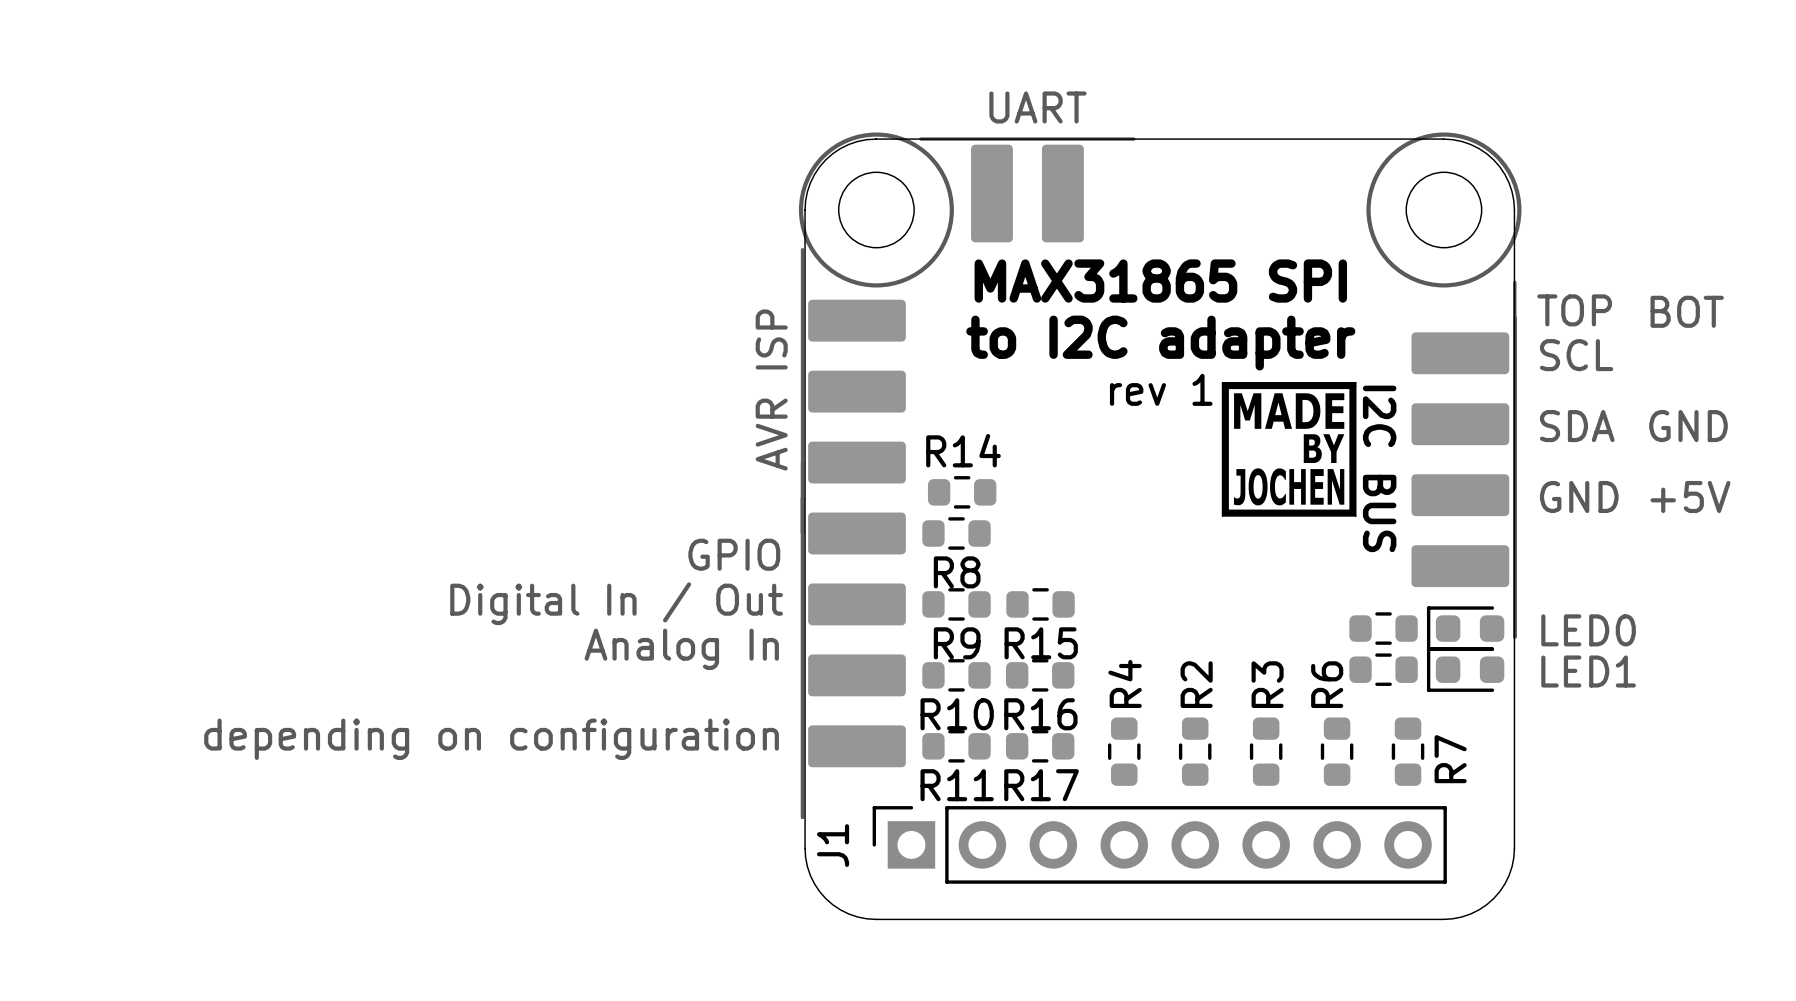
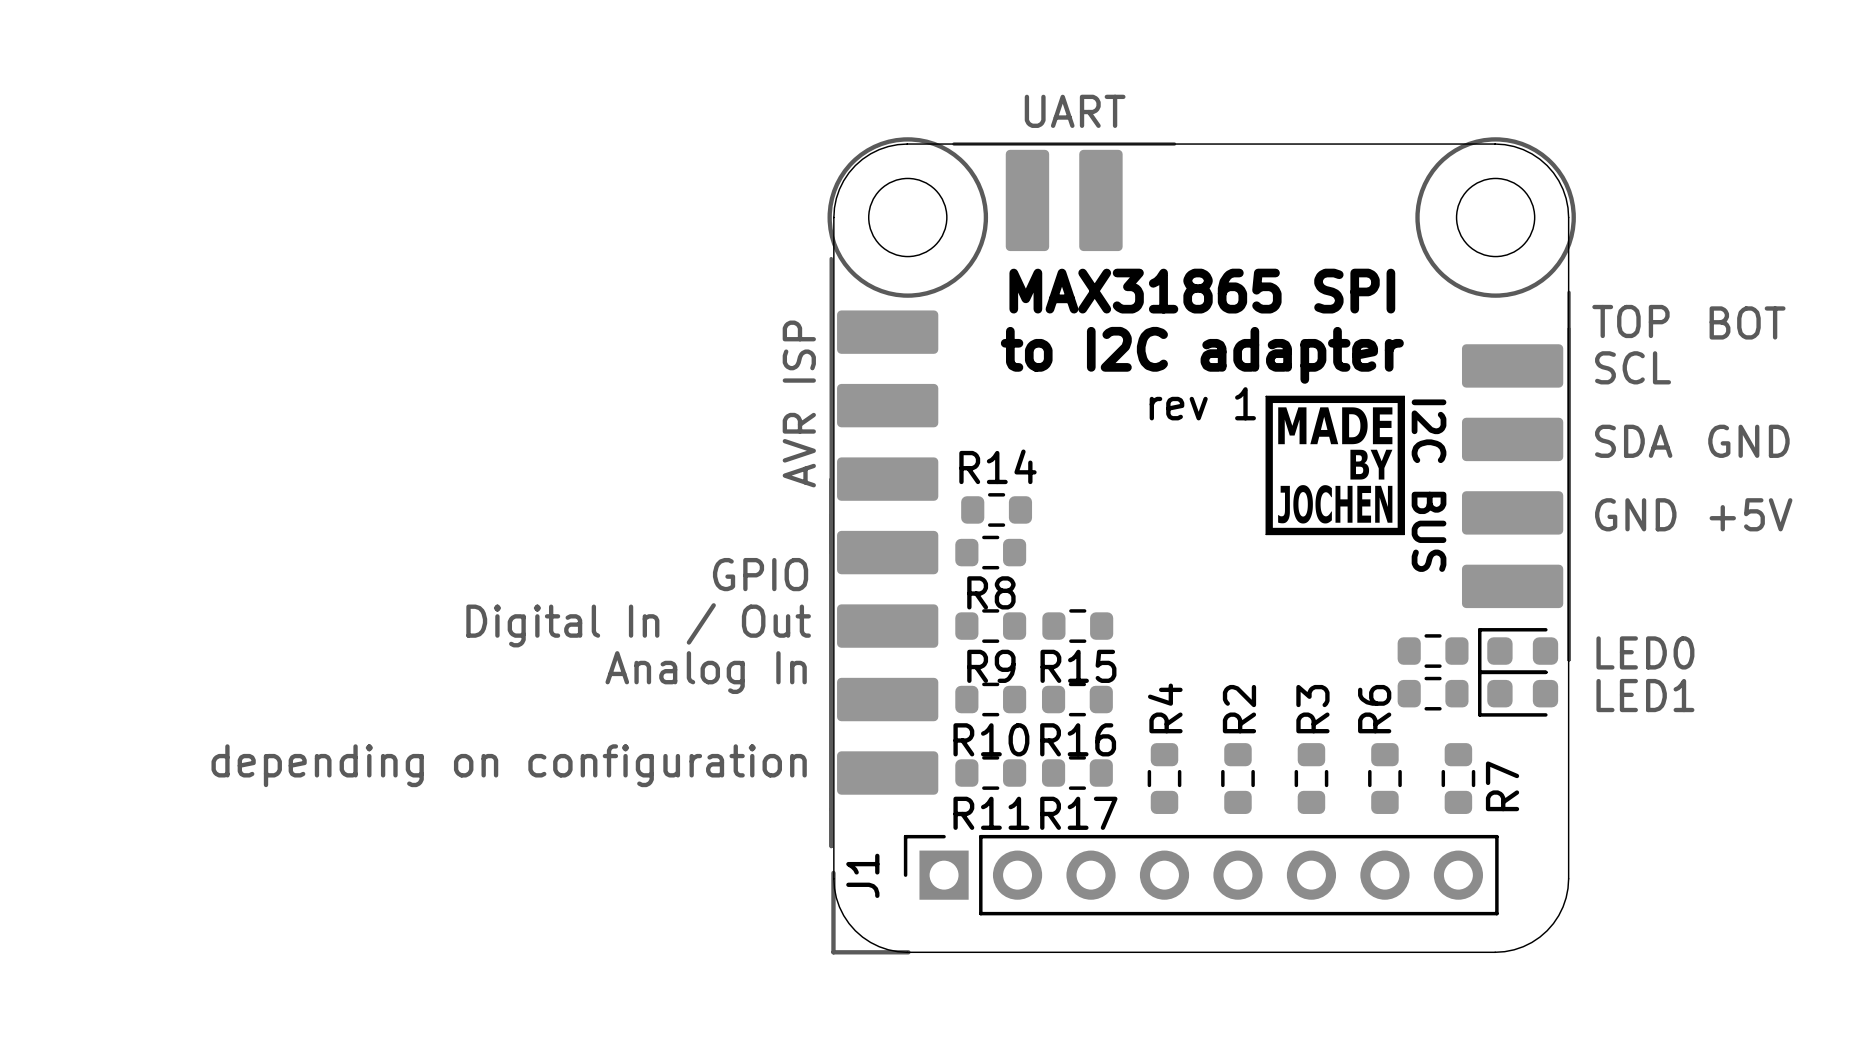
line: none -> (833, 872) (833, 952) (908, 952)

